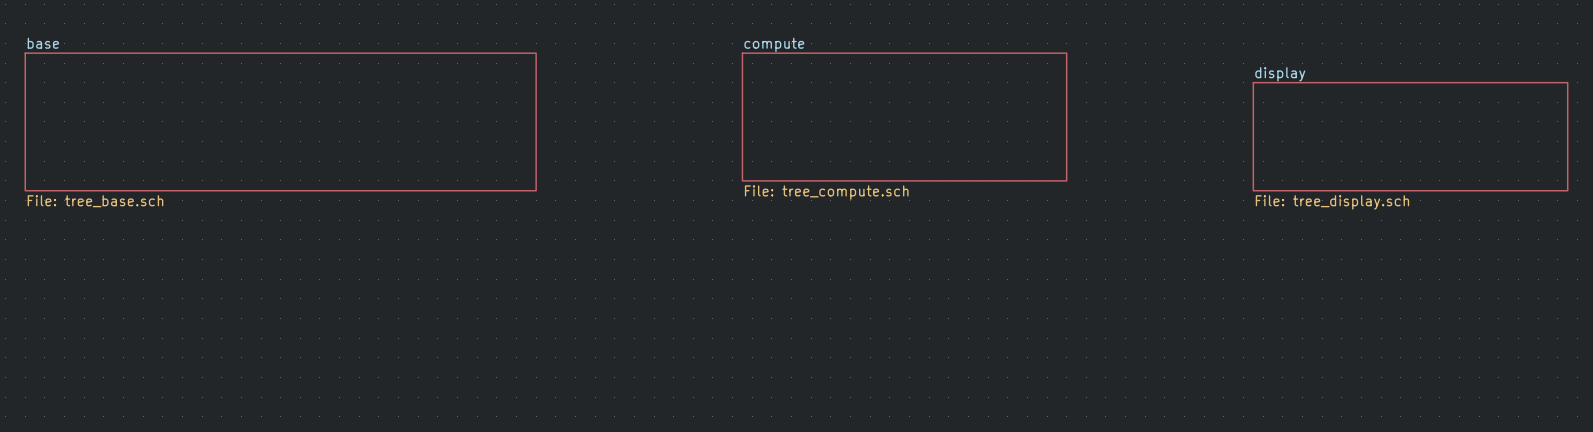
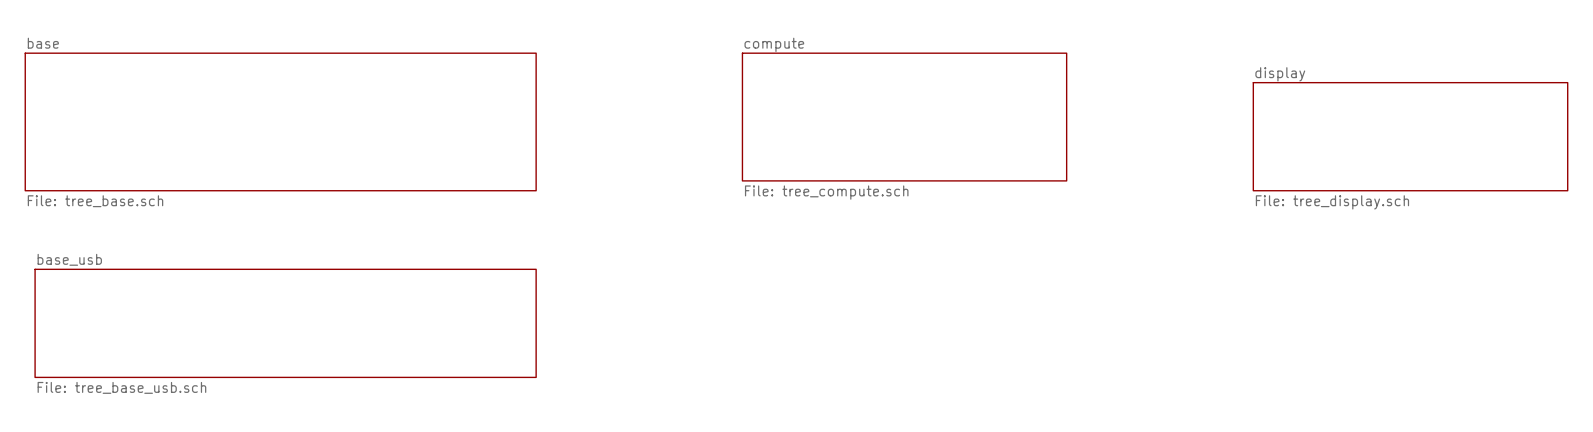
sheet base_usb: none -> File: tree_base_usb.sch (285, 323)

